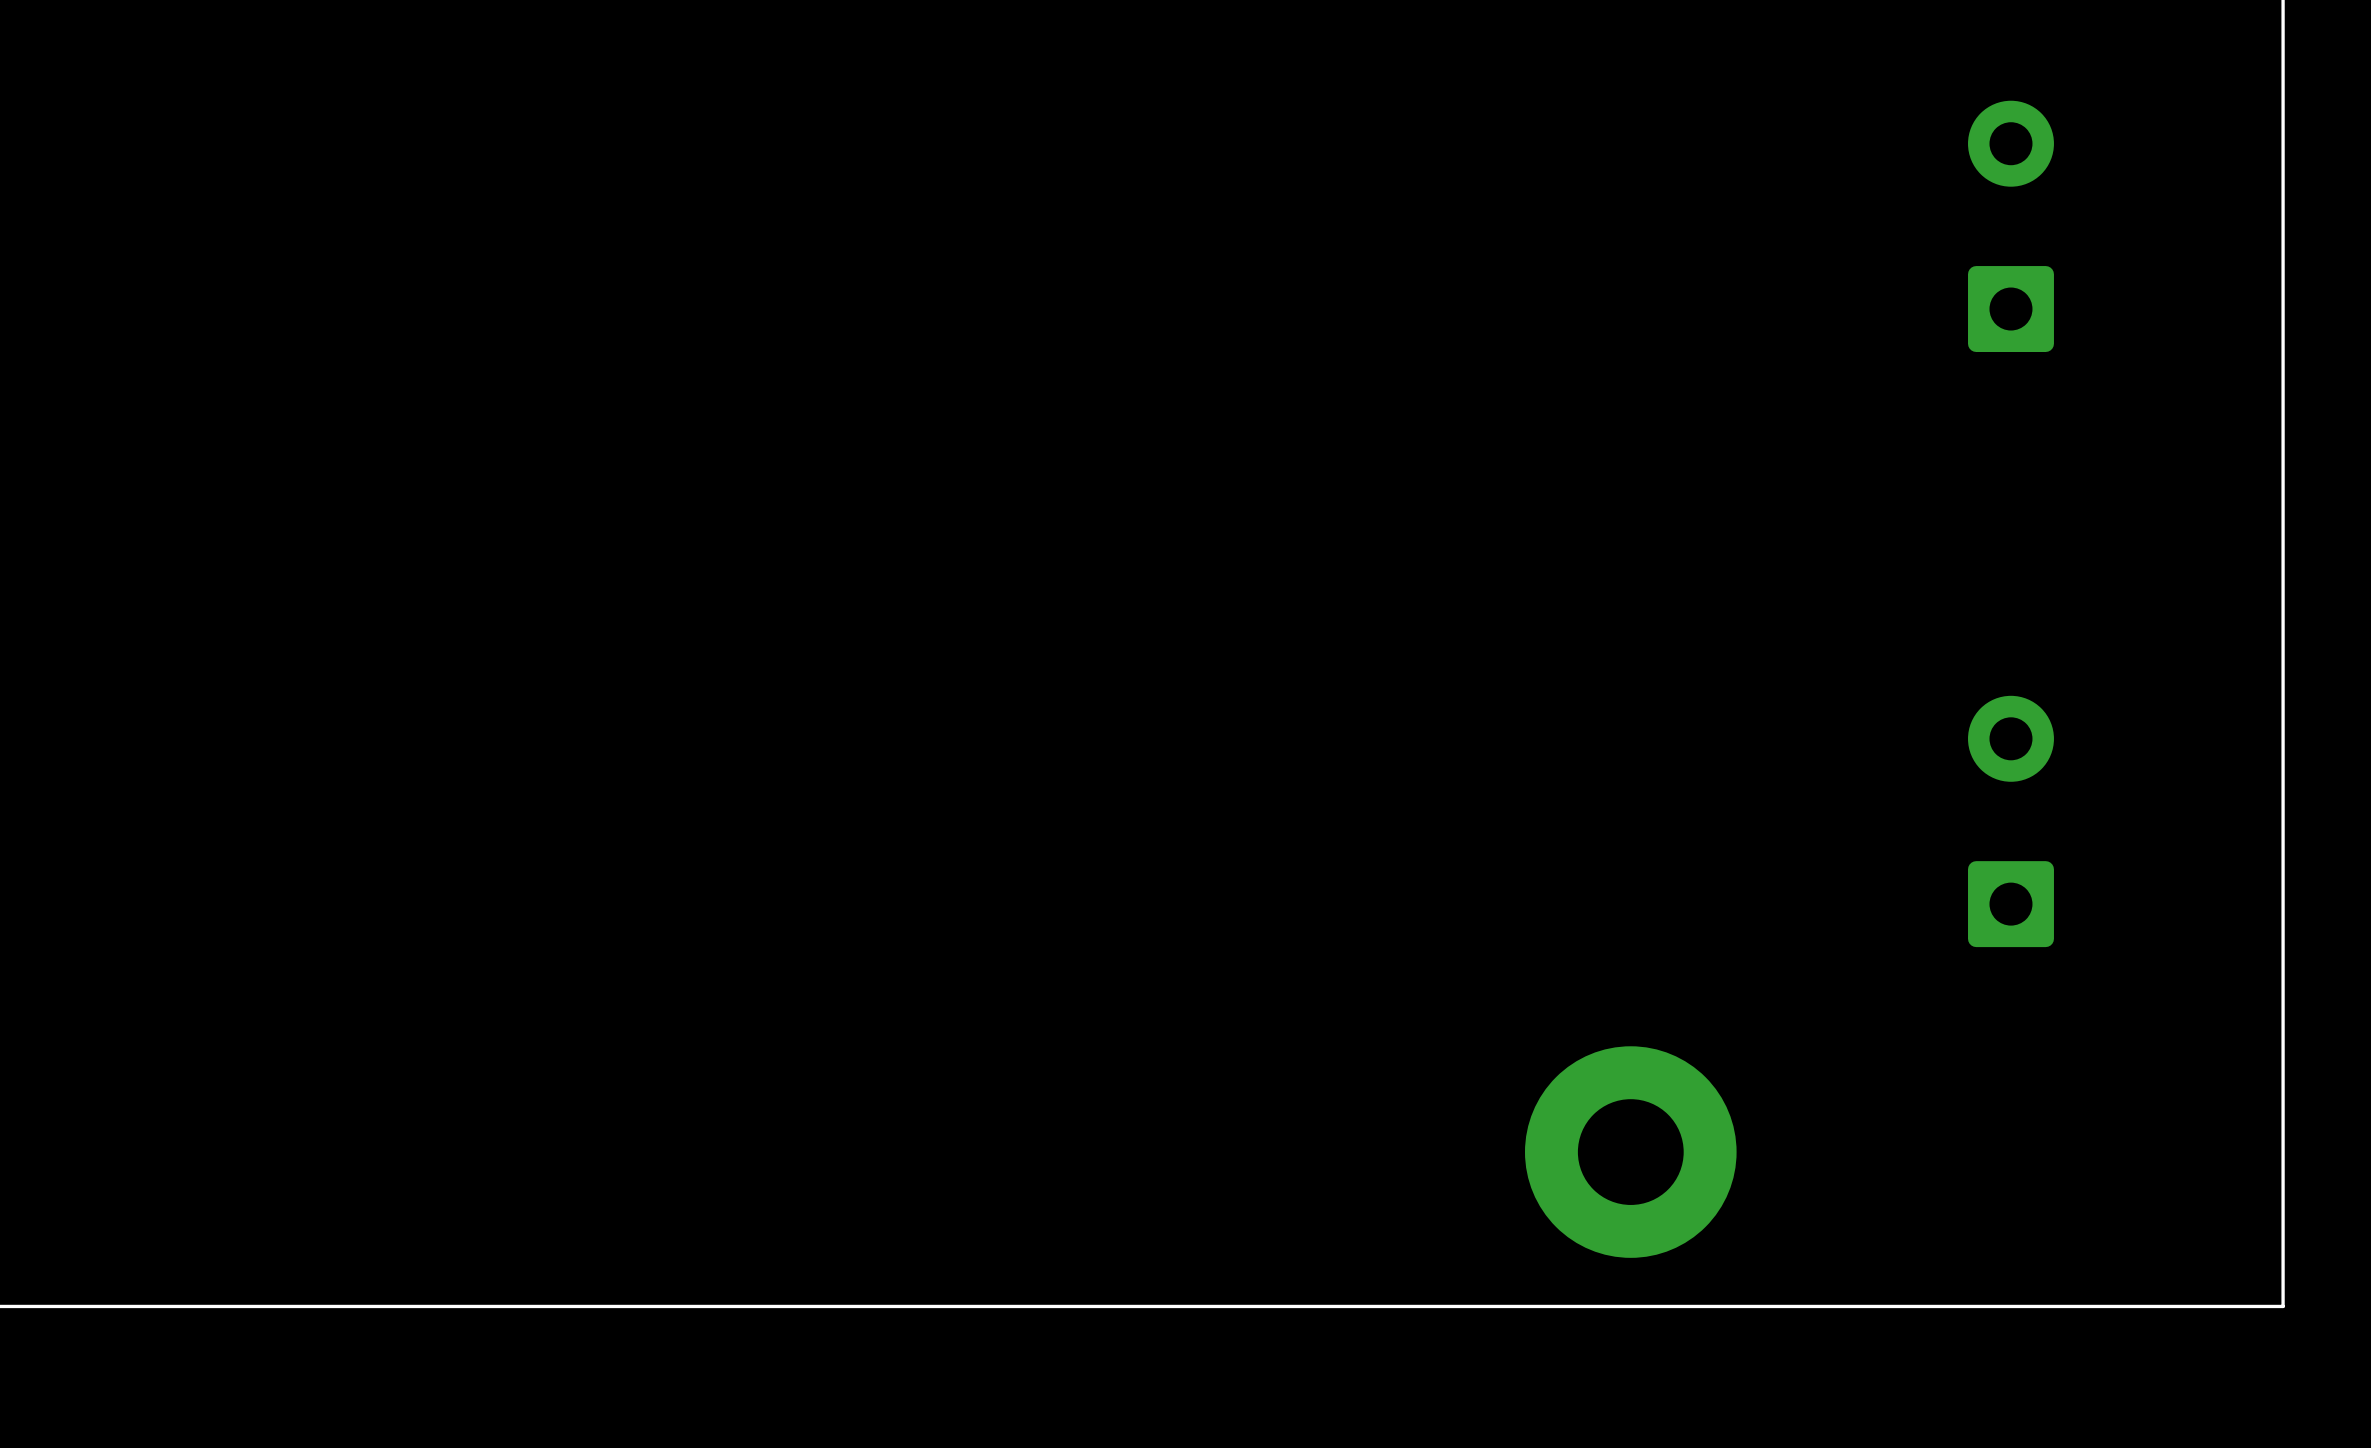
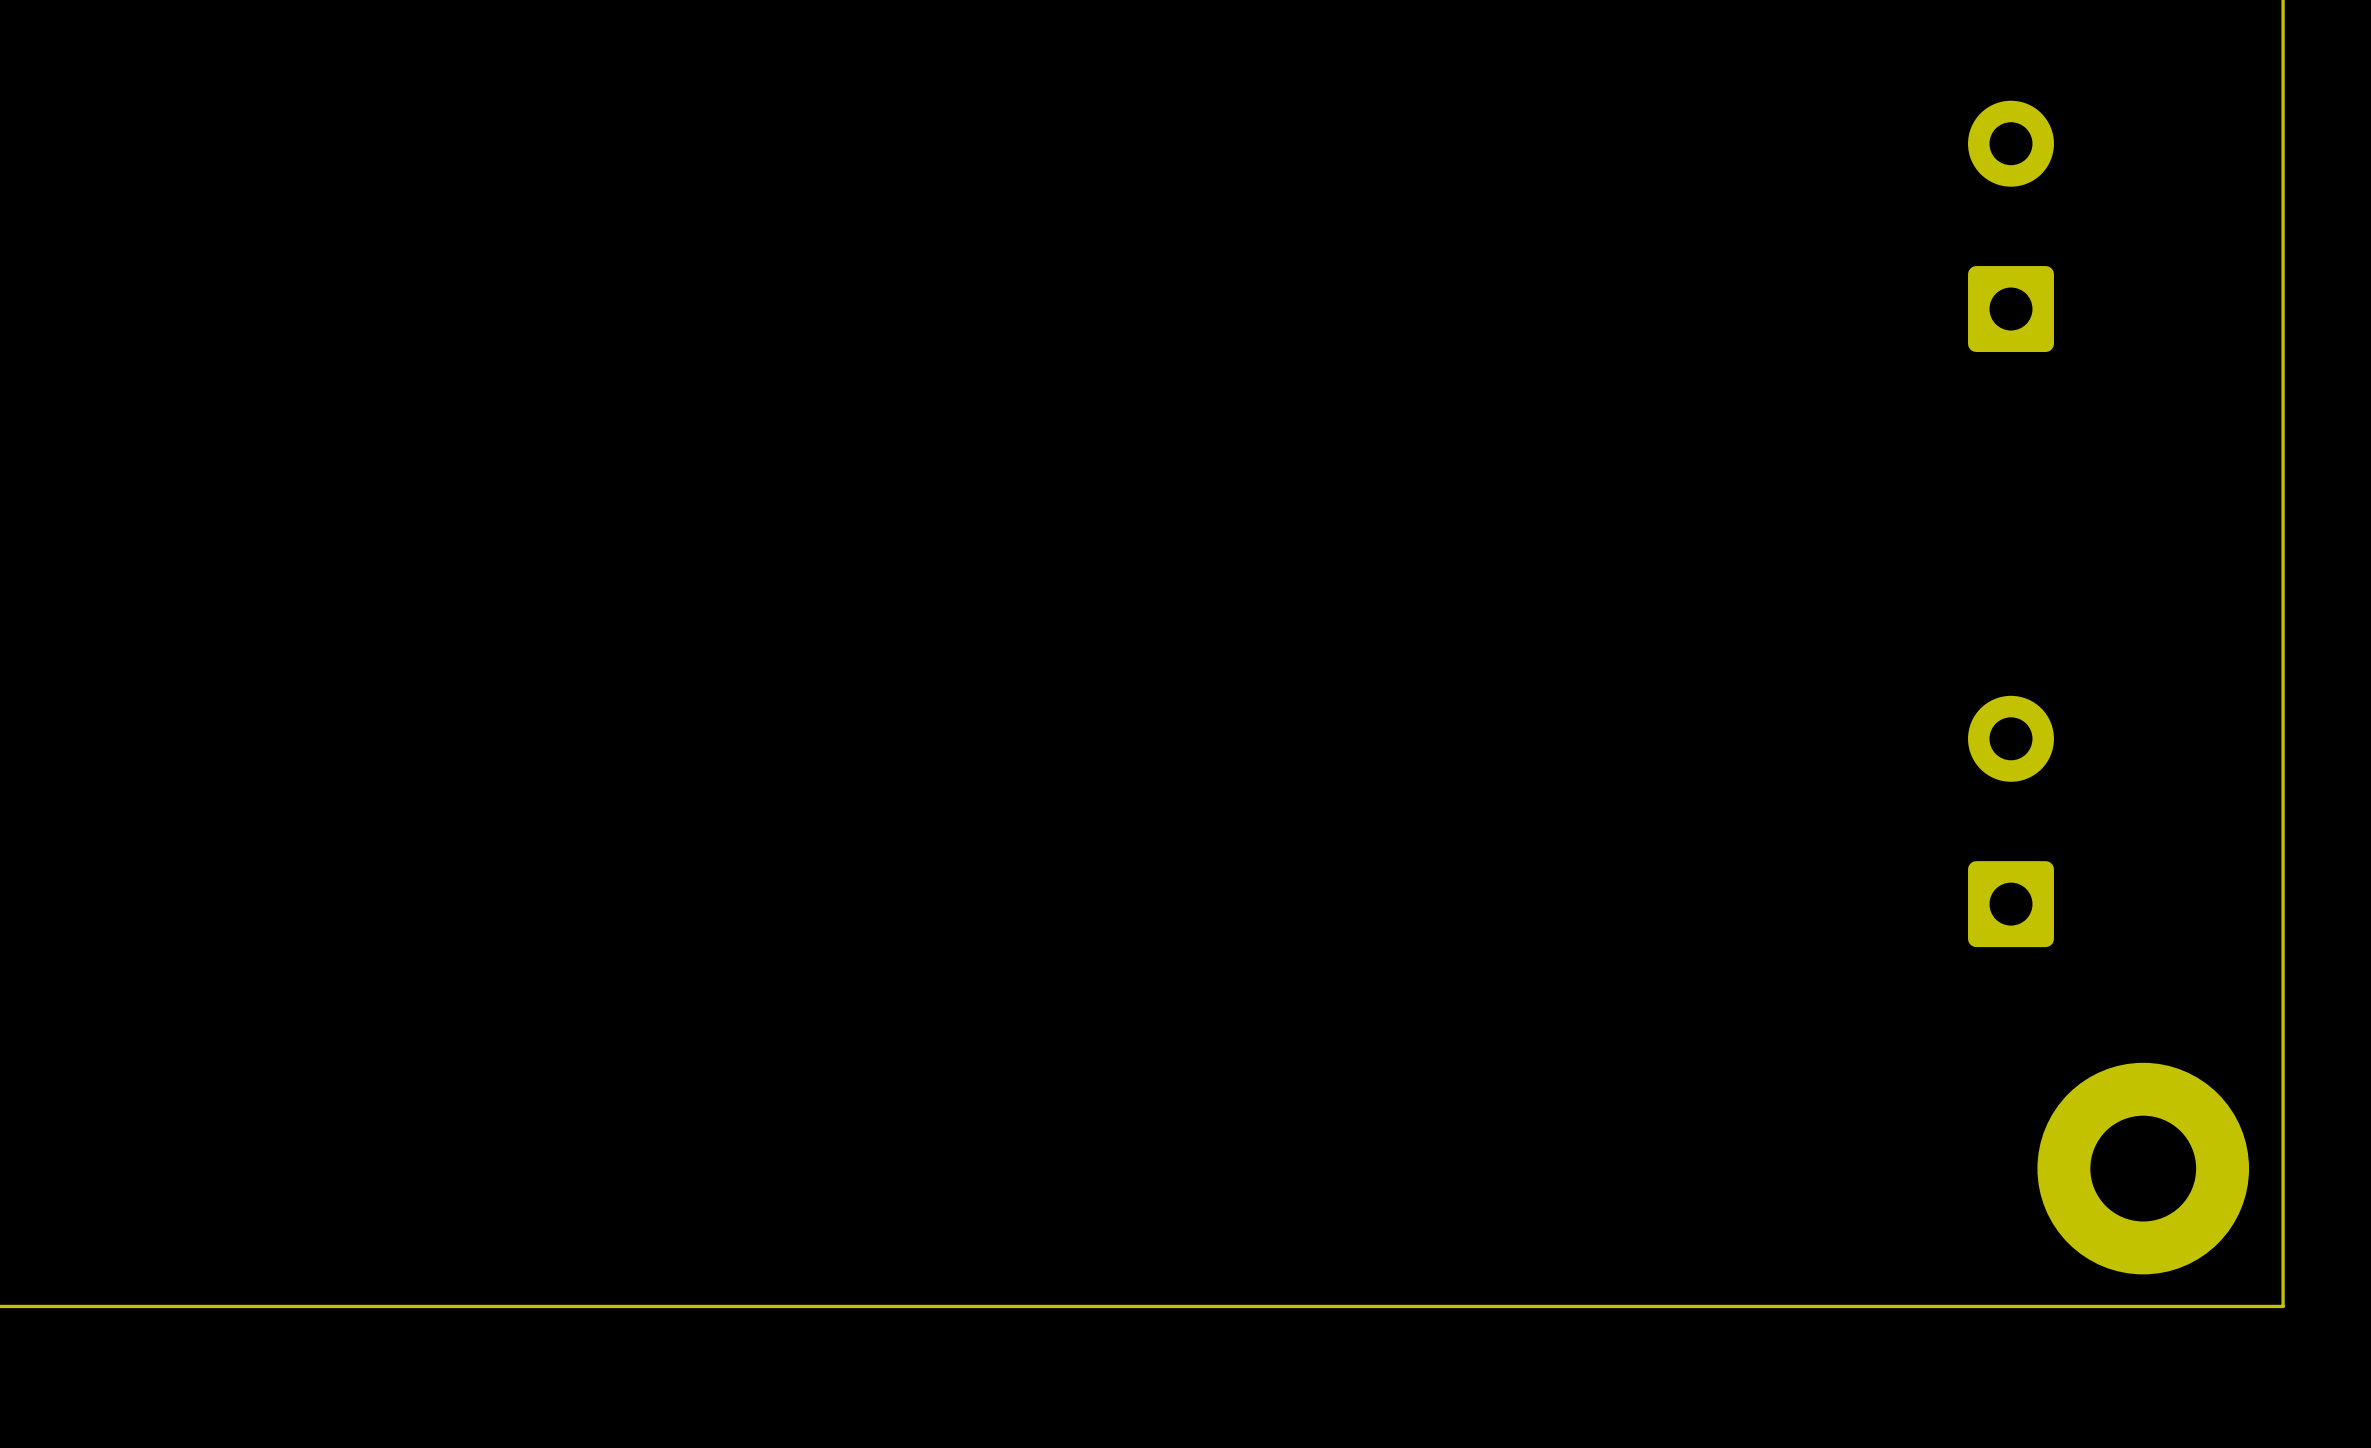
part position: (1630, 1152) -> (2143, 1168)

